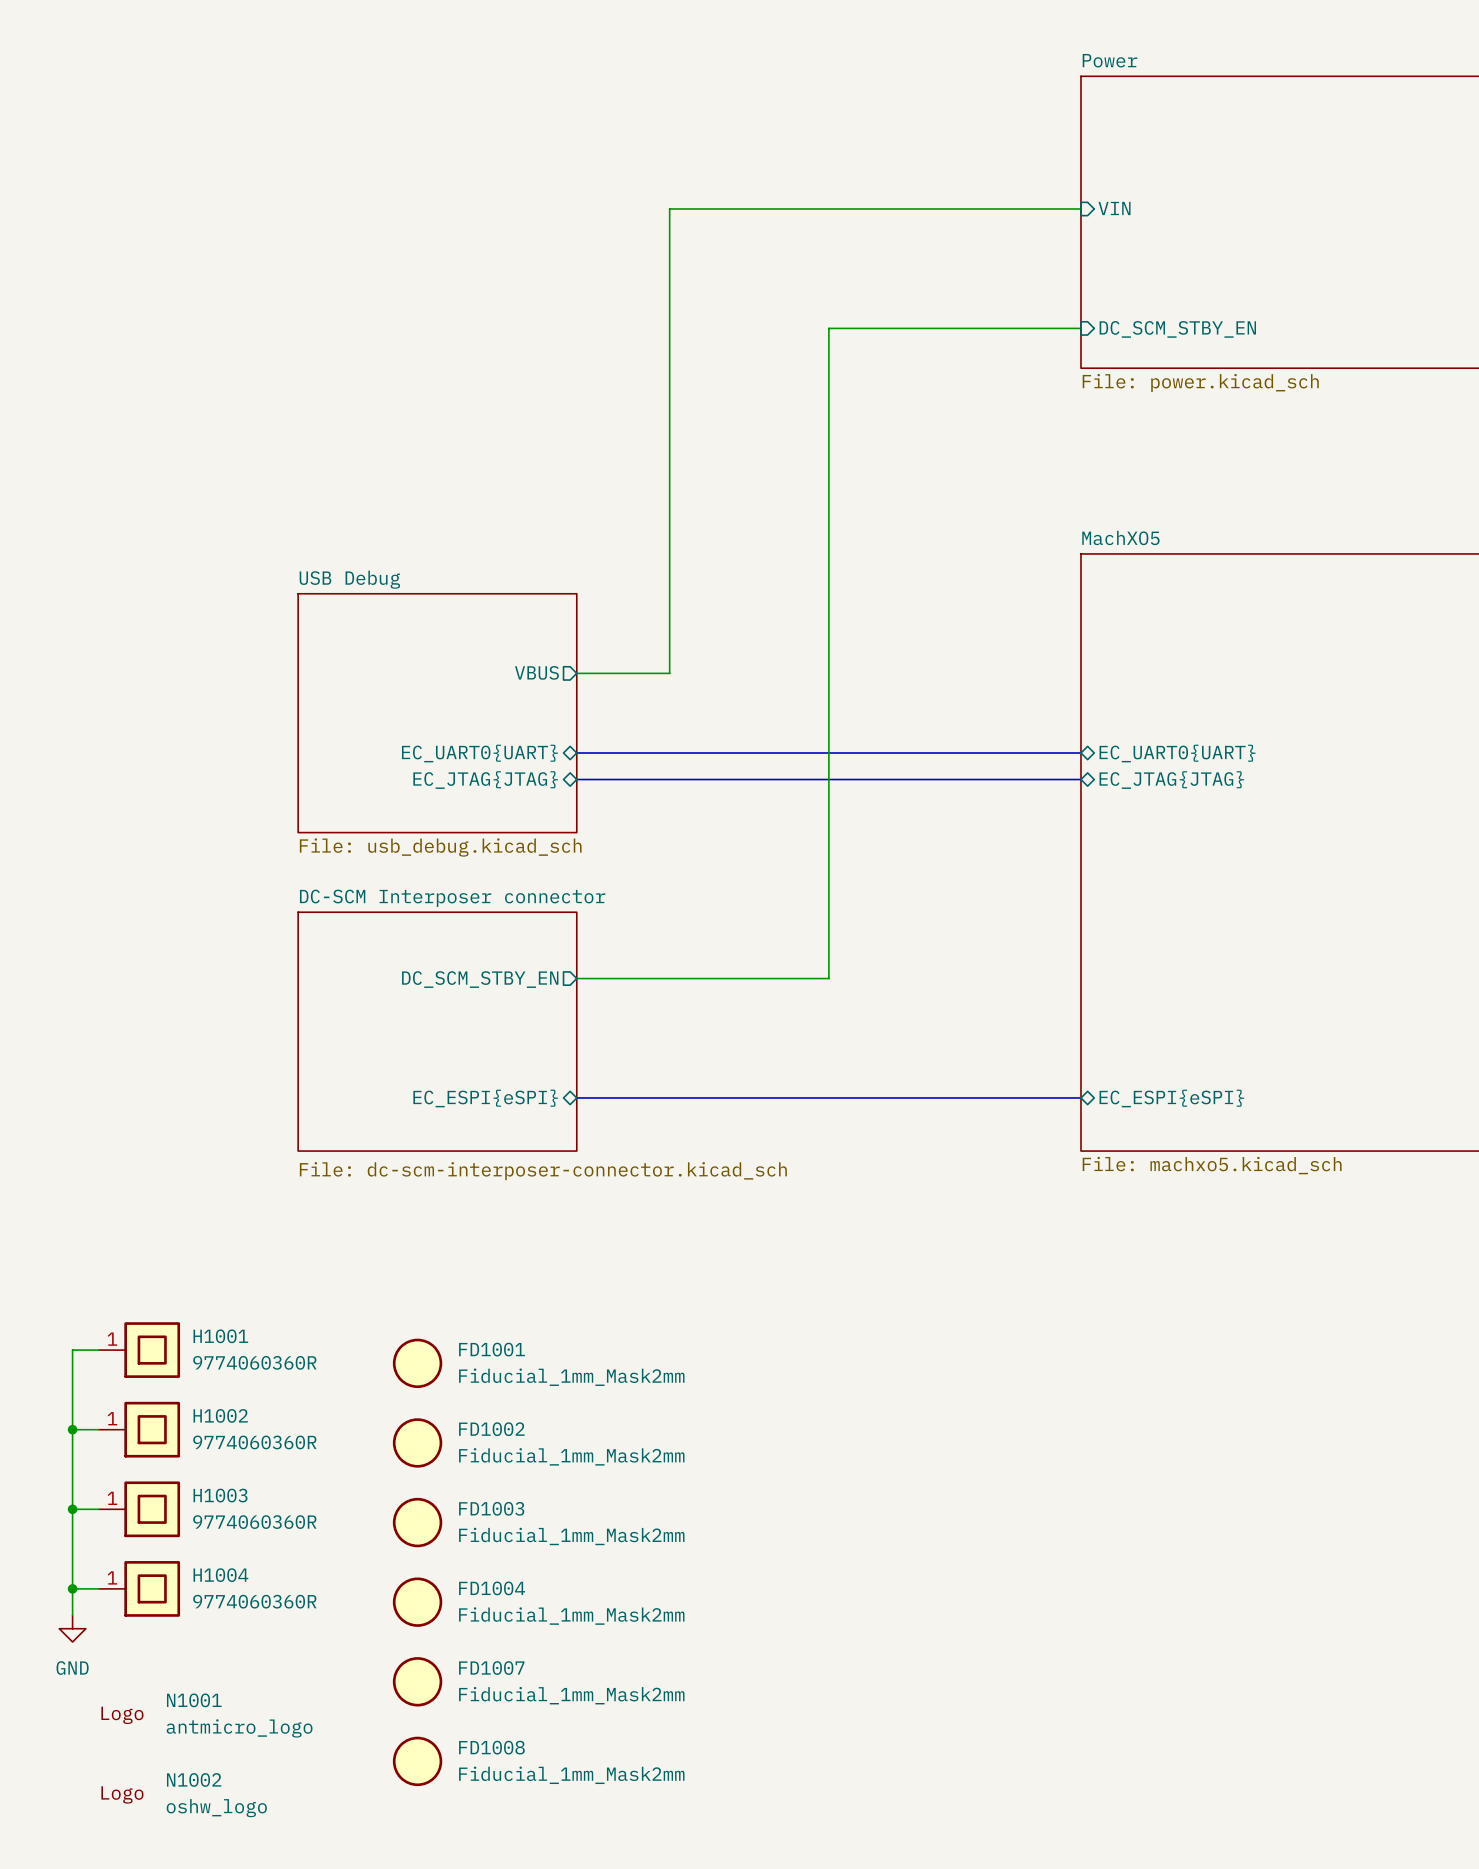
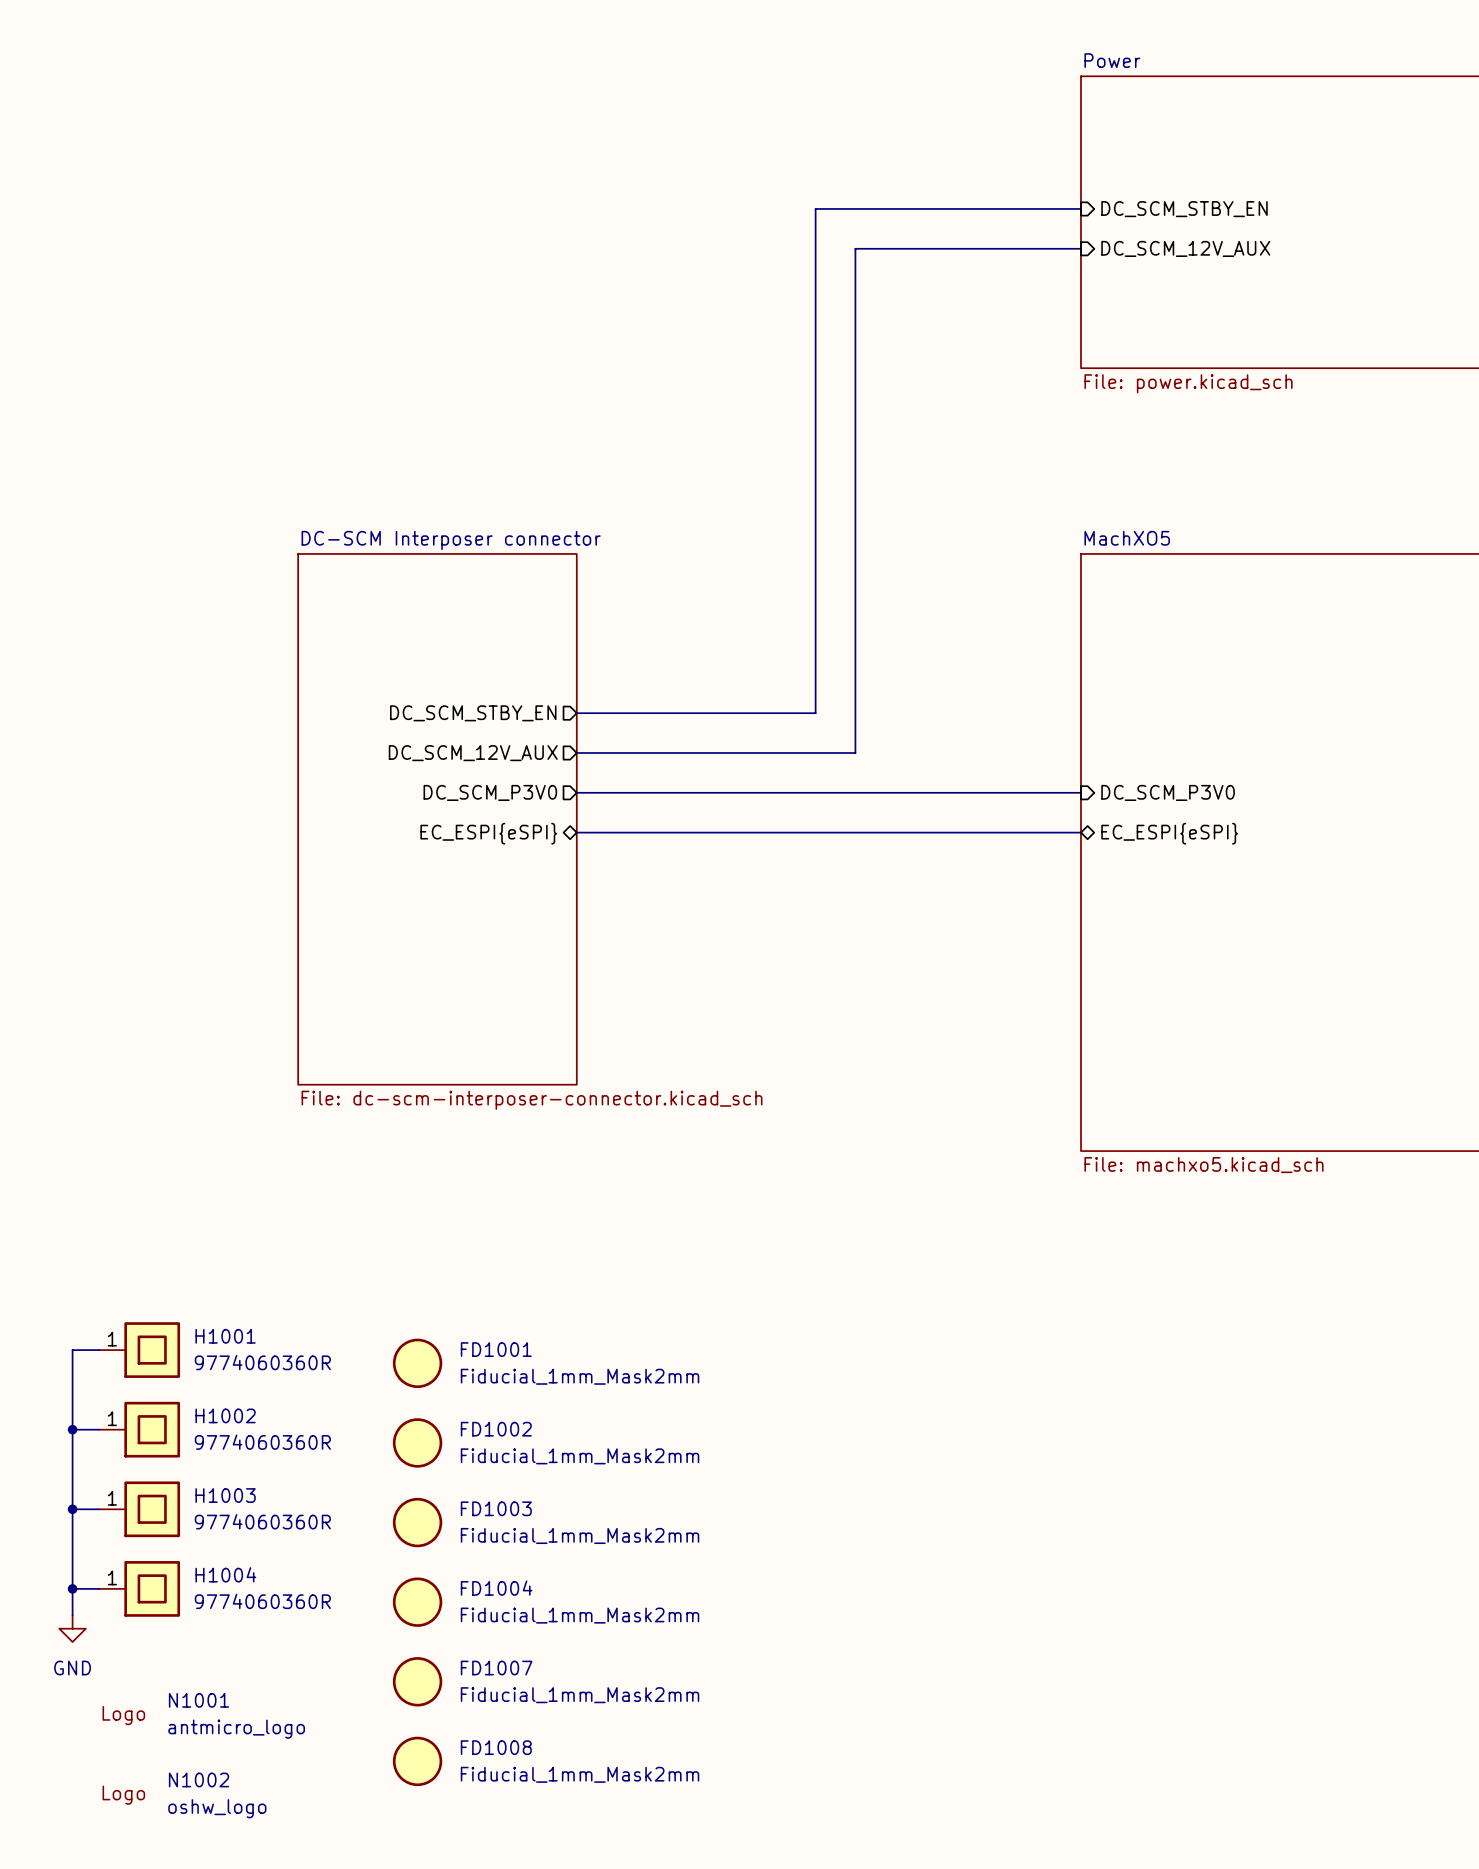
wire: (815, 208) (669, 208) (669, 673) (576, 673) -> (815, 208) (815, 713) (576, 713)
sheet pin: VIN (1114, 208) -> DC_SCM_STBY_EN (1184, 209)
wire: none -> (1080, 248) (855, 248) (855, 752) (576, 752)
sheet pin: none -> DC_SCM_12V_AUX (1185, 248)
wire: (1080, 328) (828, 328) (828, 978) (576, 978) -> none
sheet pin: DC_SCM_STBY_EN (1177, 329) -> none
sheet pin: VBUS (536, 672) -> none
sheet USB Debug: File: usb_debug.kicad_sch (437, 713) -> none
sheet pin: none -> DC_SCM_STBY_EN (473, 713)
bus: (576, 752) (1080, 752) -> none
sheet pin shape: bidirectional (479, 753) -> output (473, 753)
sheet pin: EC_UART0{UART} (479, 753) -> DC_SCM_12V_AUX (473, 753)
sheet pin: EC_UART0{UART} (1177, 753) -> none
bus: (576, 779) (1080, 779) -> (576, 832) (1080, 832)
sheet pin: EC_JTAG{JTAG} (485, 780) -> none
sheet pin: EC_JTAG{JTAG} (1171, 780) -> none
wire: none -> (576, 792) (1080, 792)
sheet pin: none -> DC_SCM_P3V0 (490, 792)
sheet pin: none -> DC_SCM_P3V0 (1168, 792)
sheet DC-SCM Interposer connector: none -> File: dc-scm-interposer-connector.kicad_sch (437, 819)
sheet pin: none -> EC_ESPI{eSPI} (488, 833)
sheet pin: none -> EC_ESPI{eSPI} (1169, 833)
sheet pin: DC_SCM_STBY_EN (480, 979) -> none
sheet DC-SCM Interposer connector: File: dc-scm-interposer-connector.kicad_sch (437, 1031) -> none
bus: (576, 1097) (1080, 1097) -> none
sheet pin: EC_ESPI{eSPI} (485, 1098) -> none
sheet pin: EC_ESPI{eSPI} (1171, 1098) -> none

